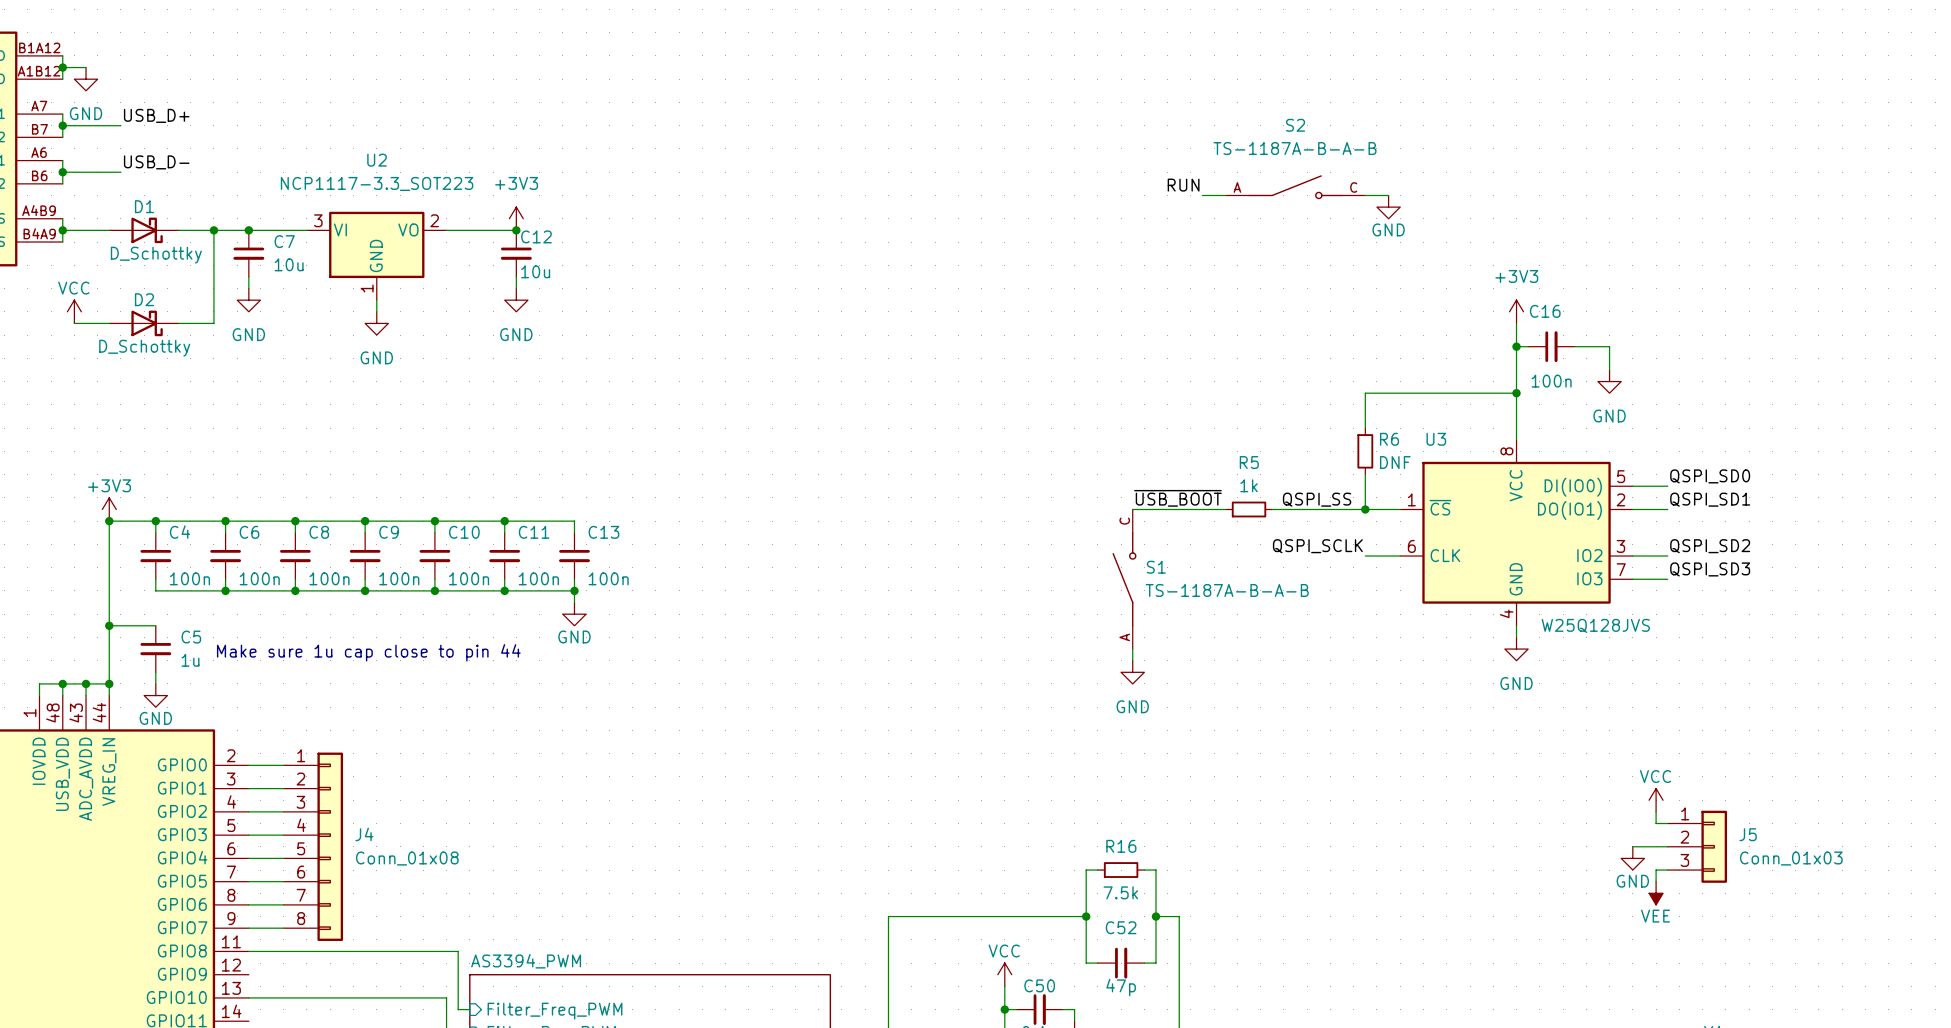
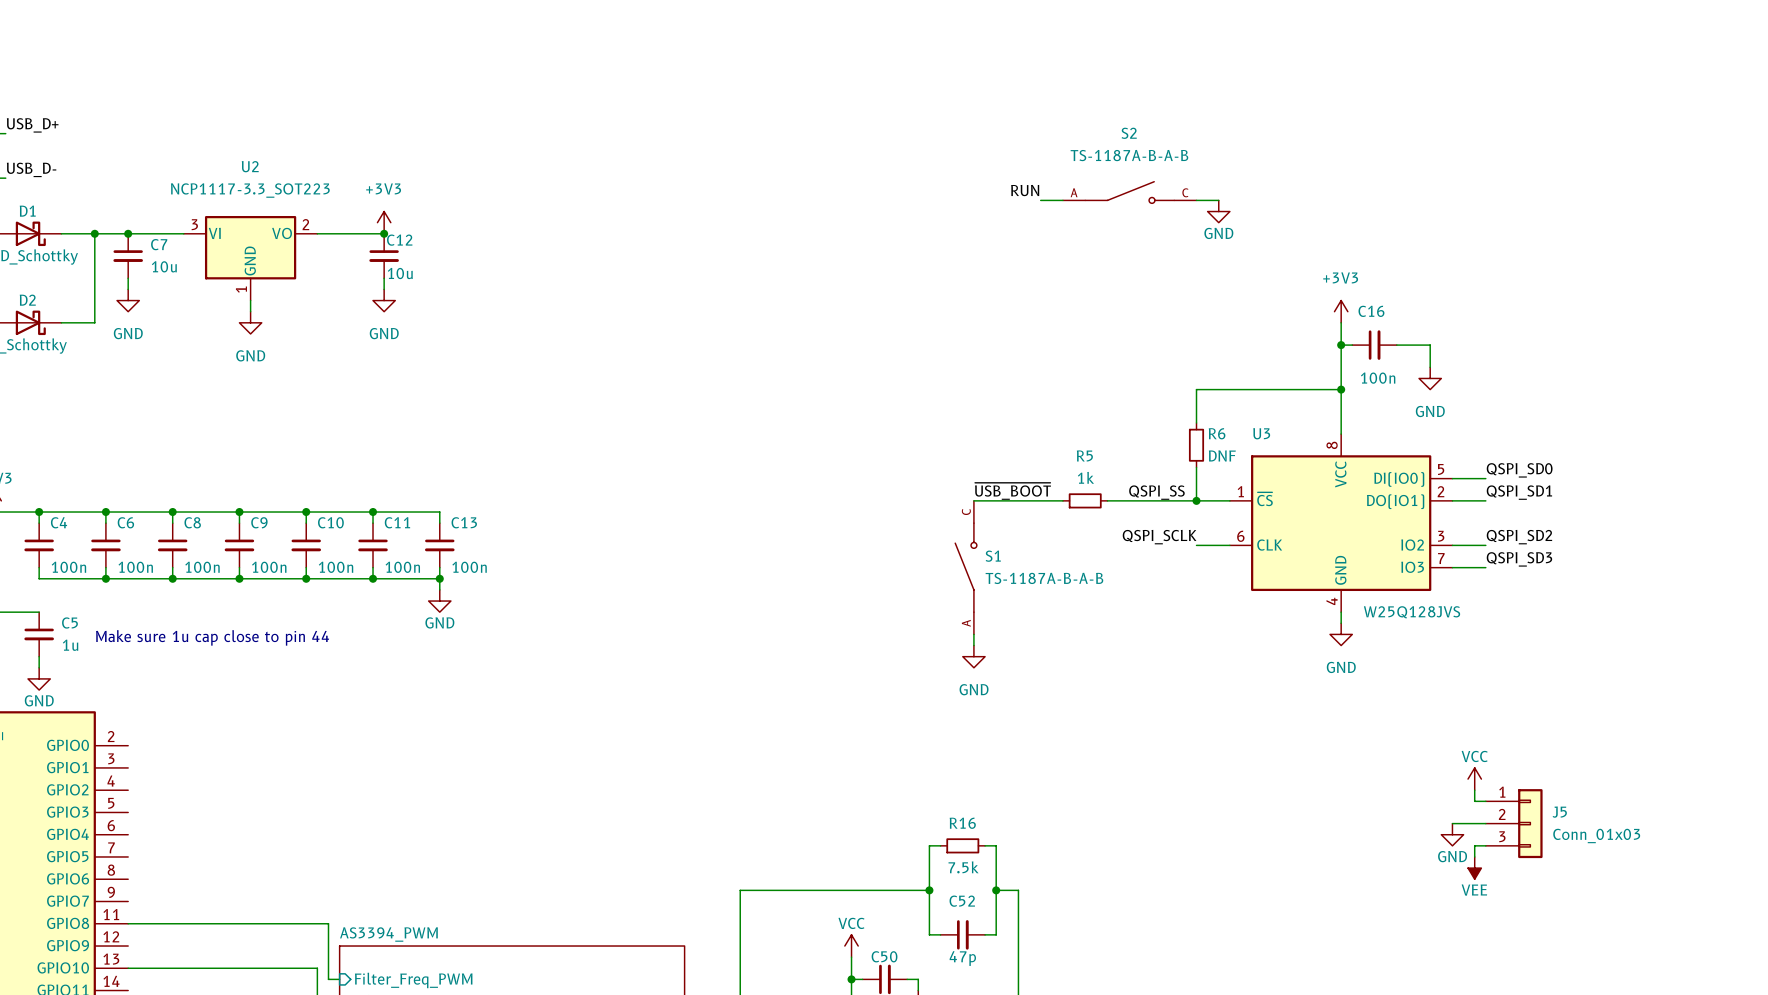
wire: (248, 765) (283, 765) -> none
wire: (248, 788) (283, 788) -> none
wire: (248, 811) (283, 811) -> none
wire: (248, 835) (283, 835) -> none
J4: Conn_01x08 (313, 846) -> none
wire: (248, 858) (283, 858) -> none
wire: (248, 881) (283, 881) -> none
wire: (248, 904) (283, 904) -> none
wire: (248, 928) (283, 928) -> none

